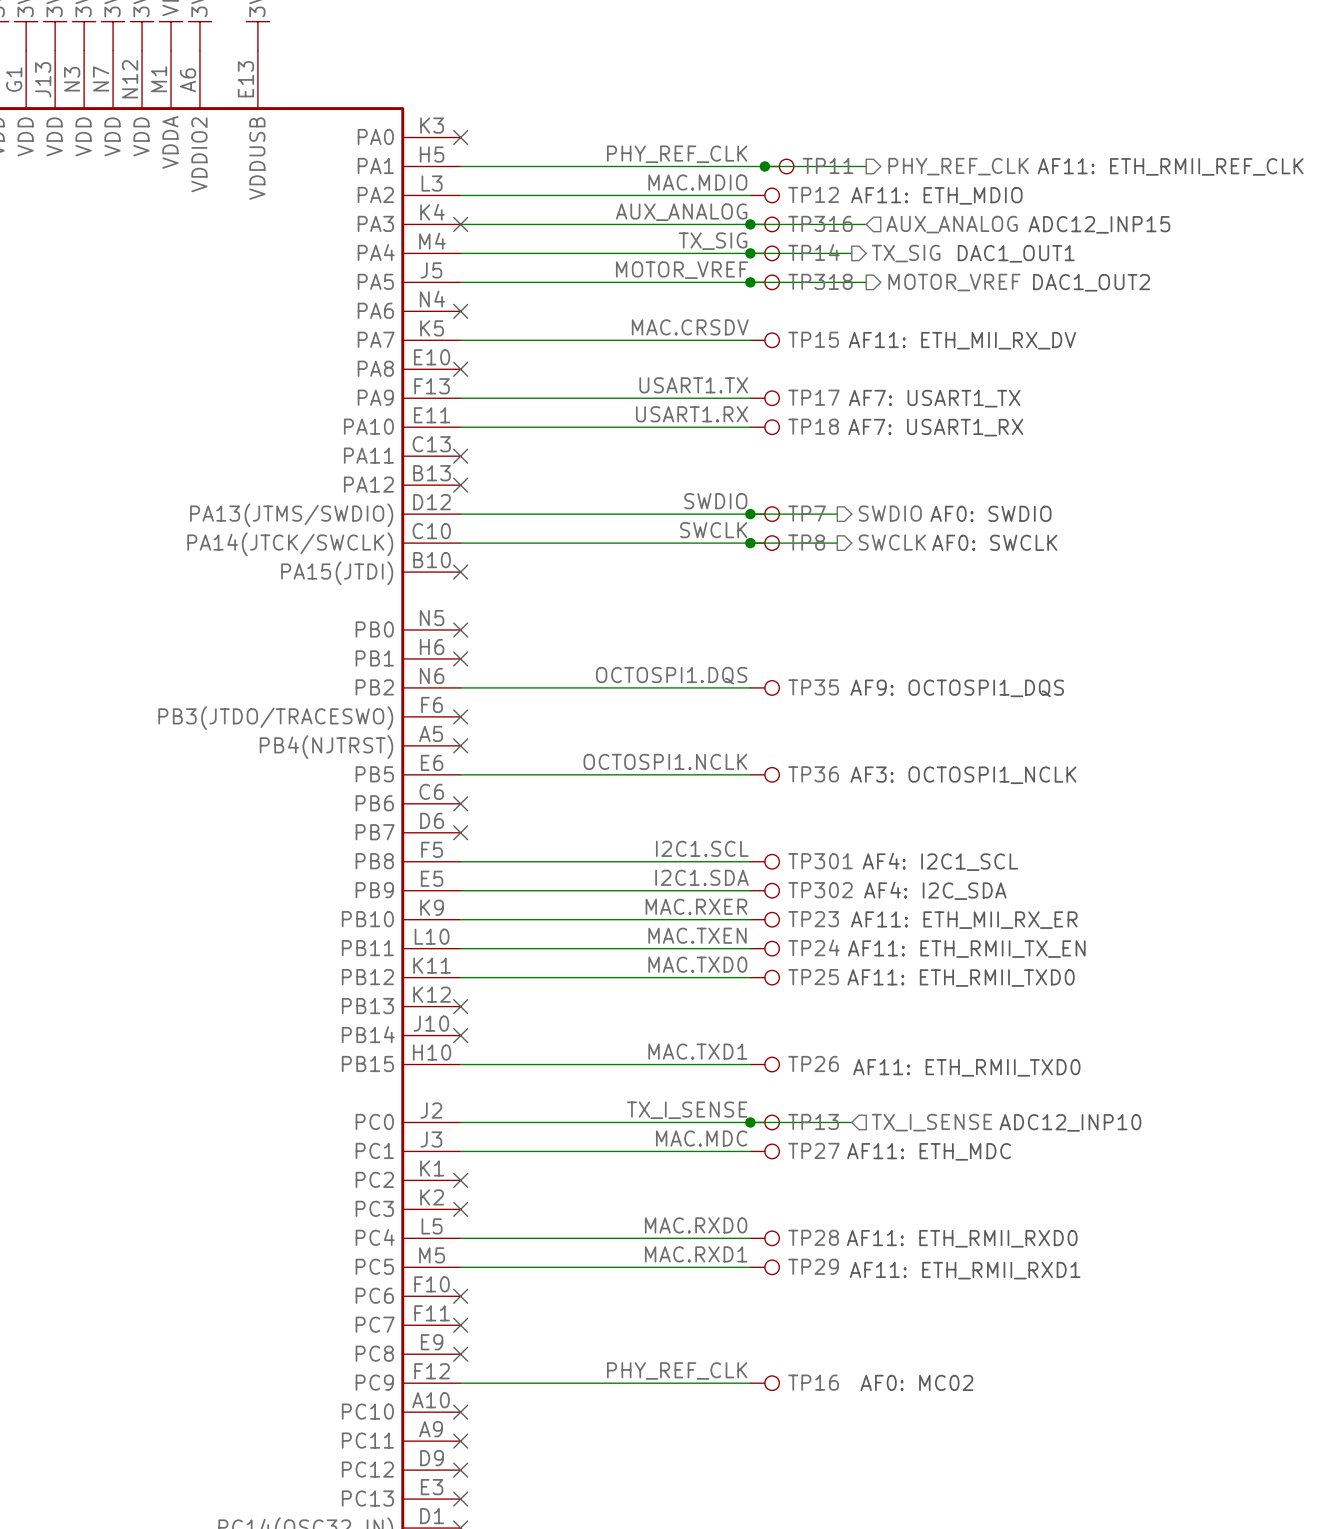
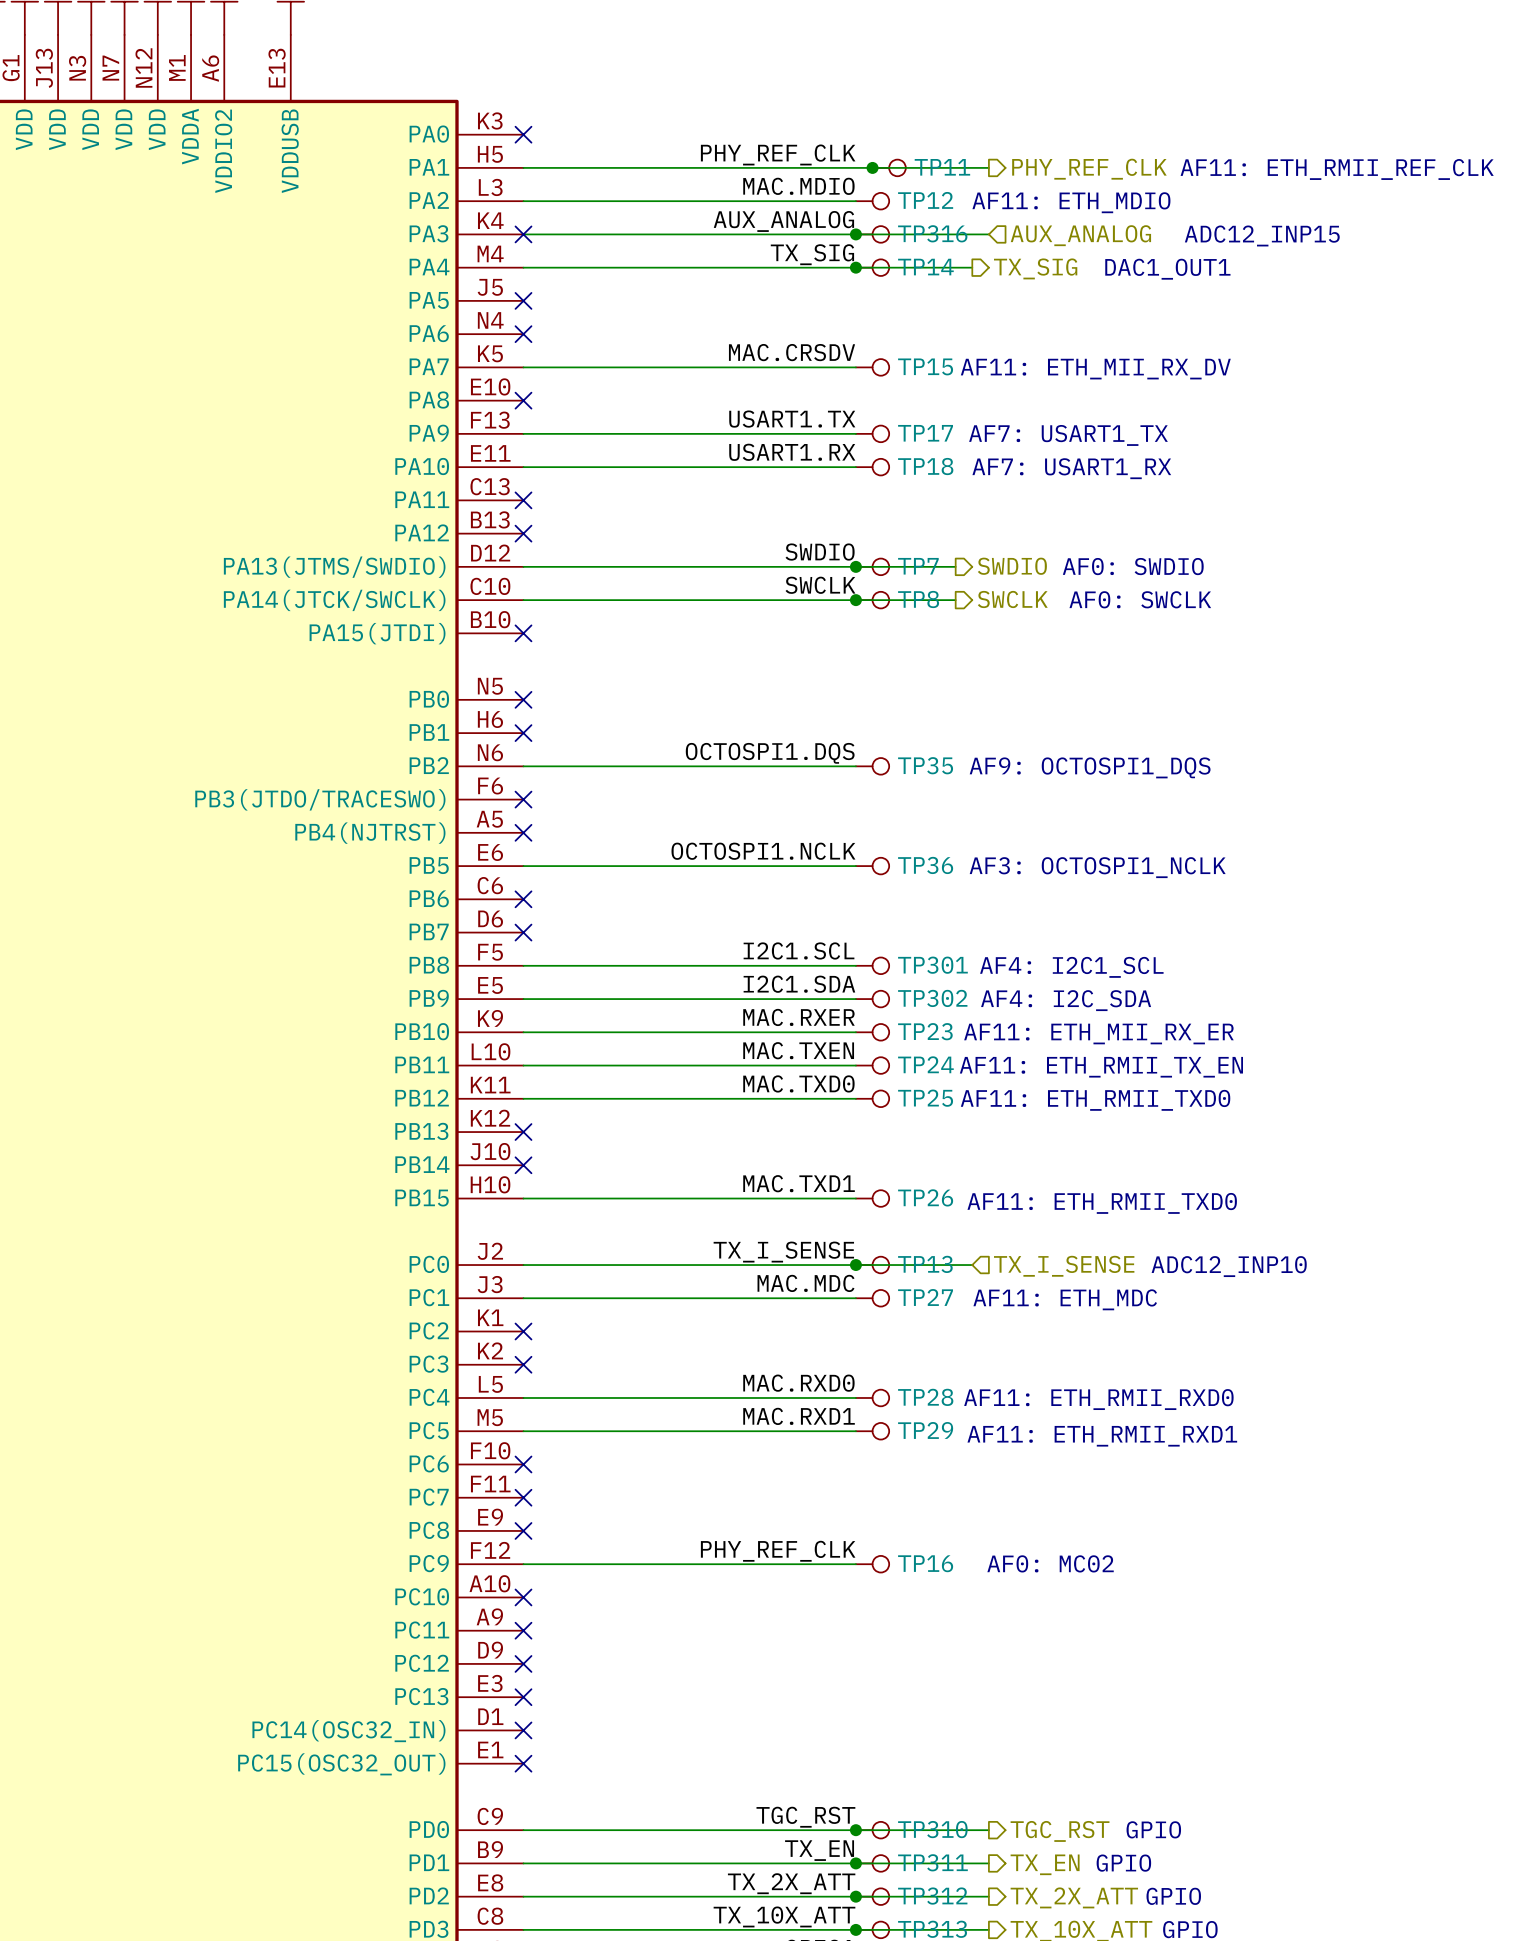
label: MOTOR_VREF (681, 270) -> none
wire: (460, 282) (866, 282) -> none
no-connect mark: none -> (523, 300)
junction: (750, 282) -> none
TP318: (764, 282) -> none
hierarchical label: MOTOR_VREF (954, 282) -> none
text: DAC1_OUT2 (1091, 282) -> none

